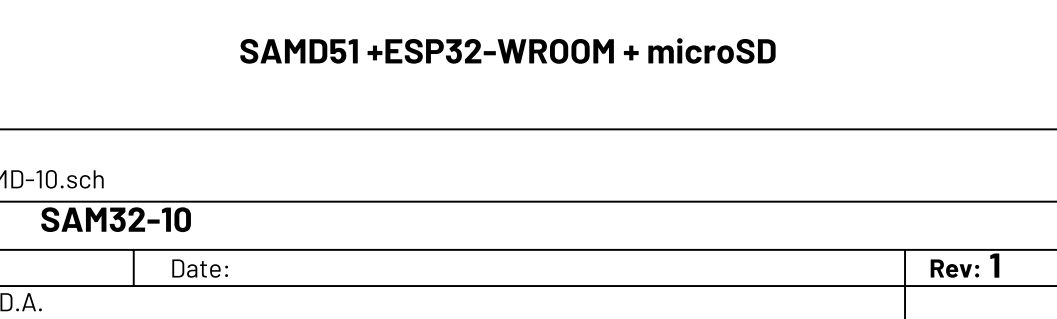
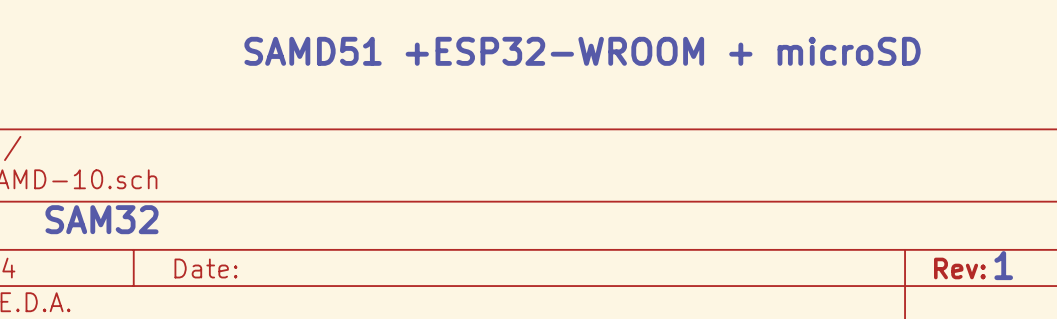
text: SAM32-10 (116, 219) -> SAM32 (101, 219)

